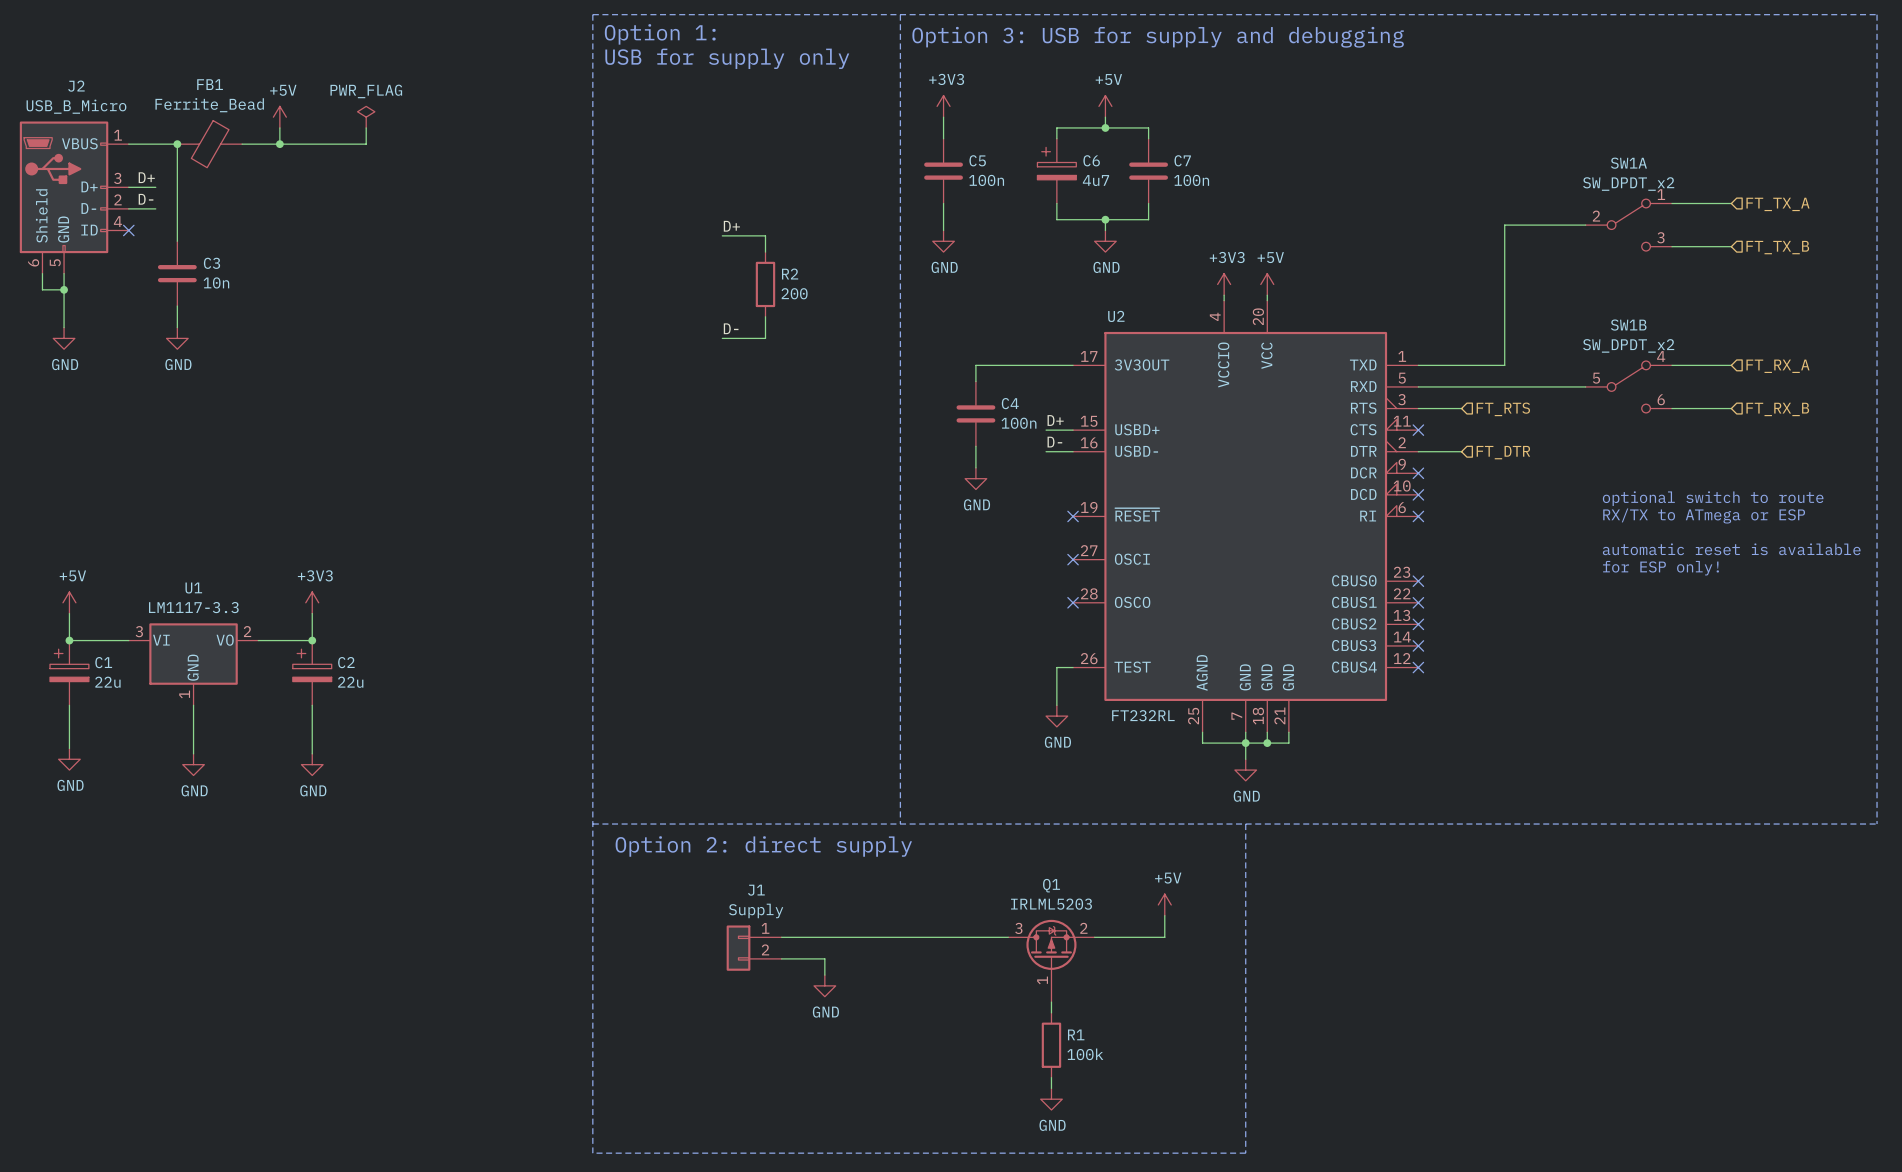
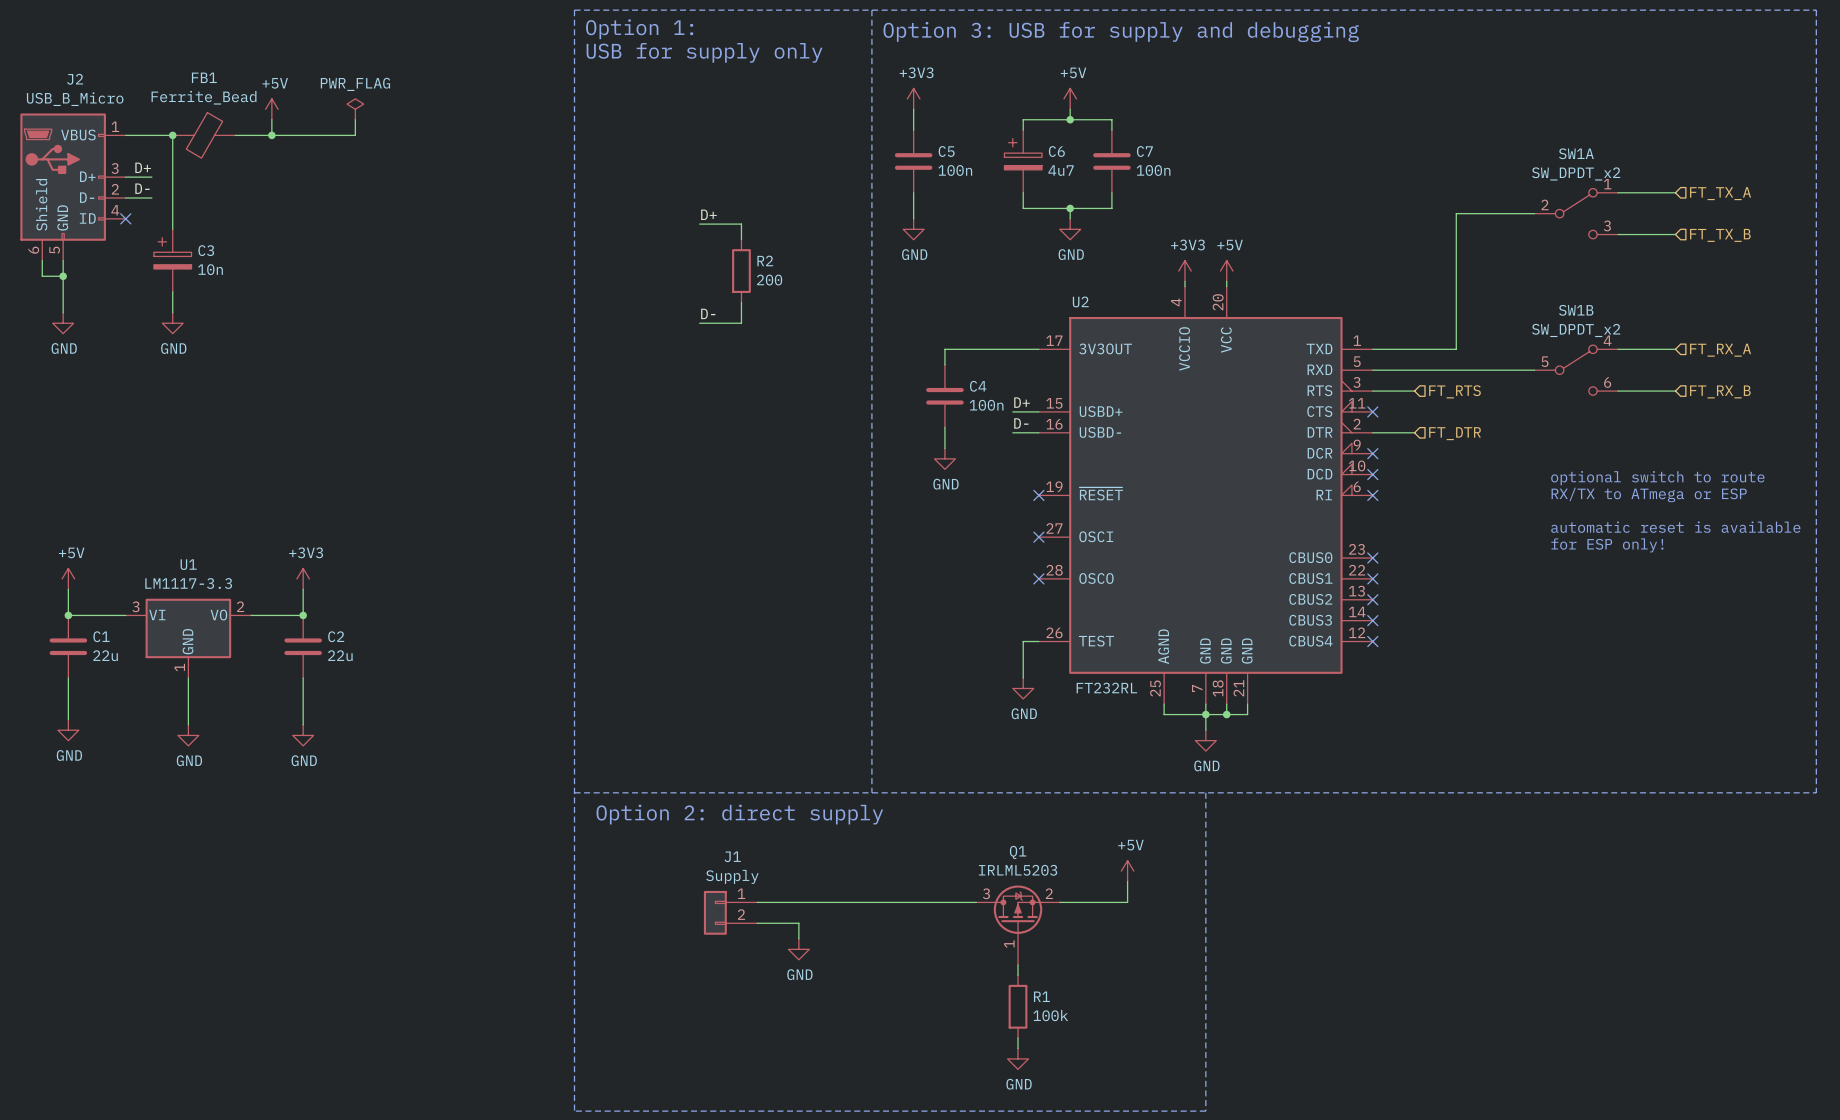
C3 symbol: [157, 241, 197, 307] -> [153, 229, 192, 292]
C1 symbol: [50, 640, 89, 706] -> [49, 615, 88, 679]
C2 symbol: [292, 640, 332, 706] -> [284, 615, 322, 679]

